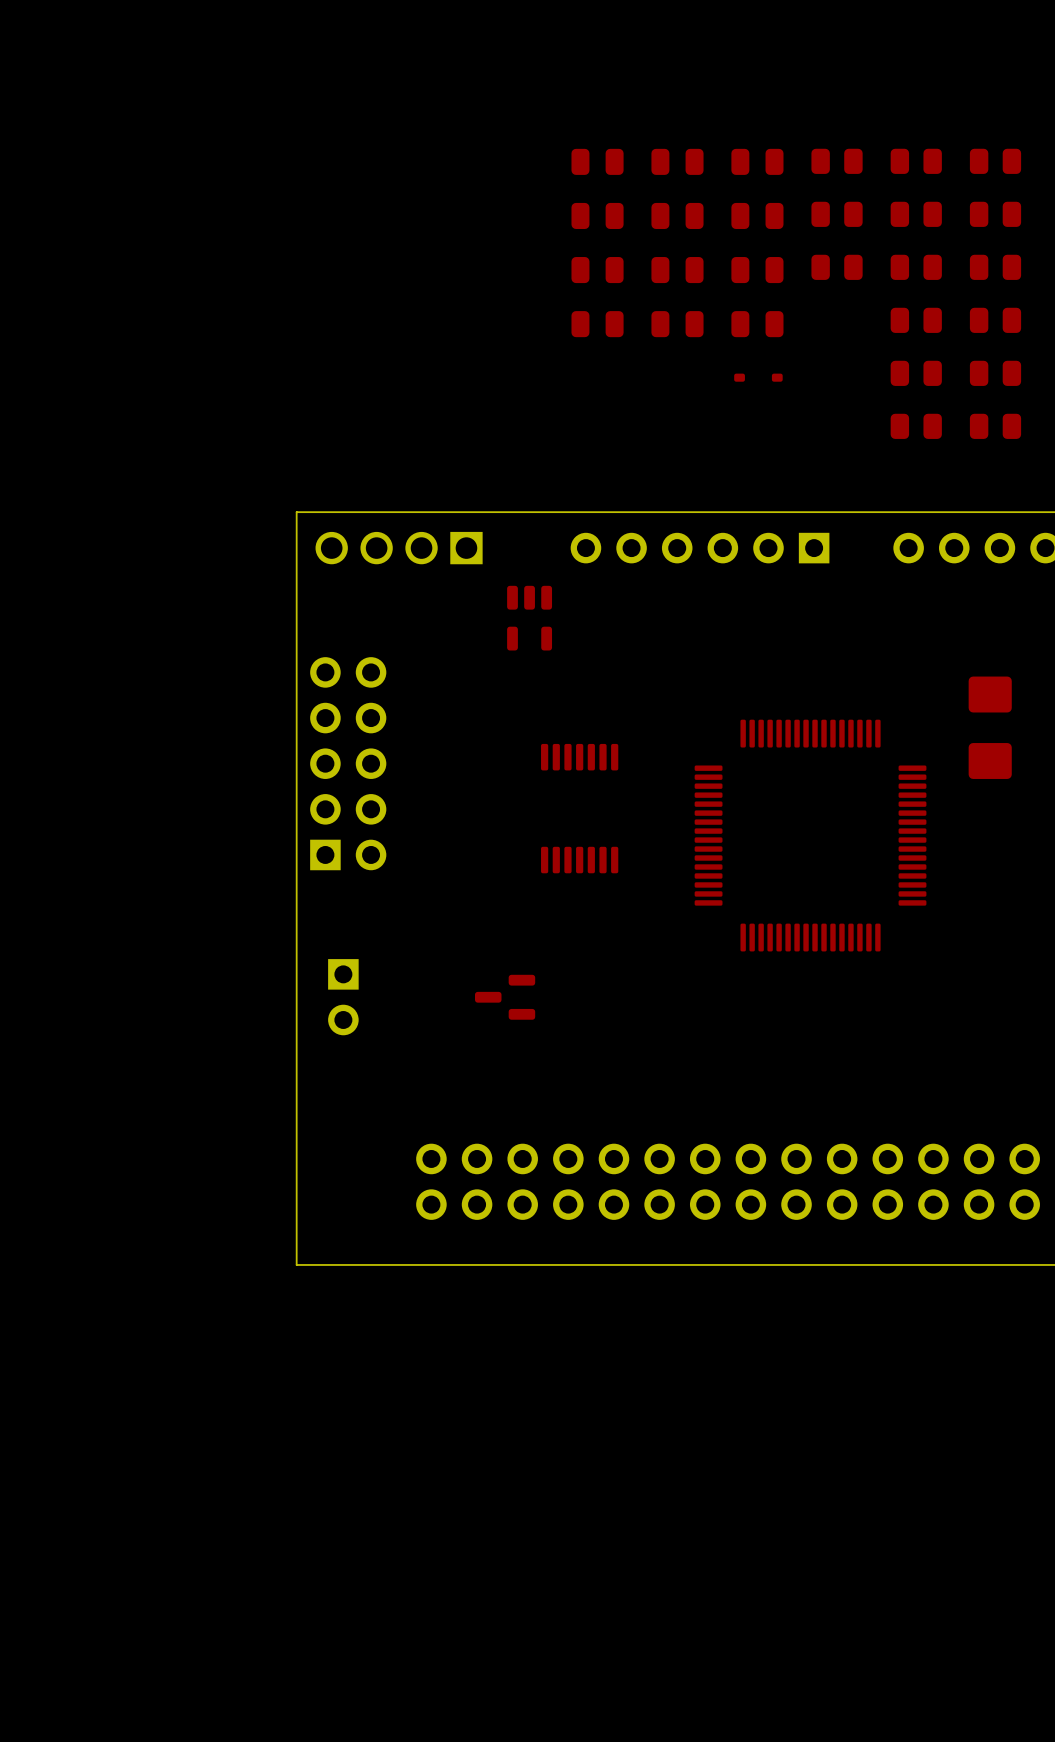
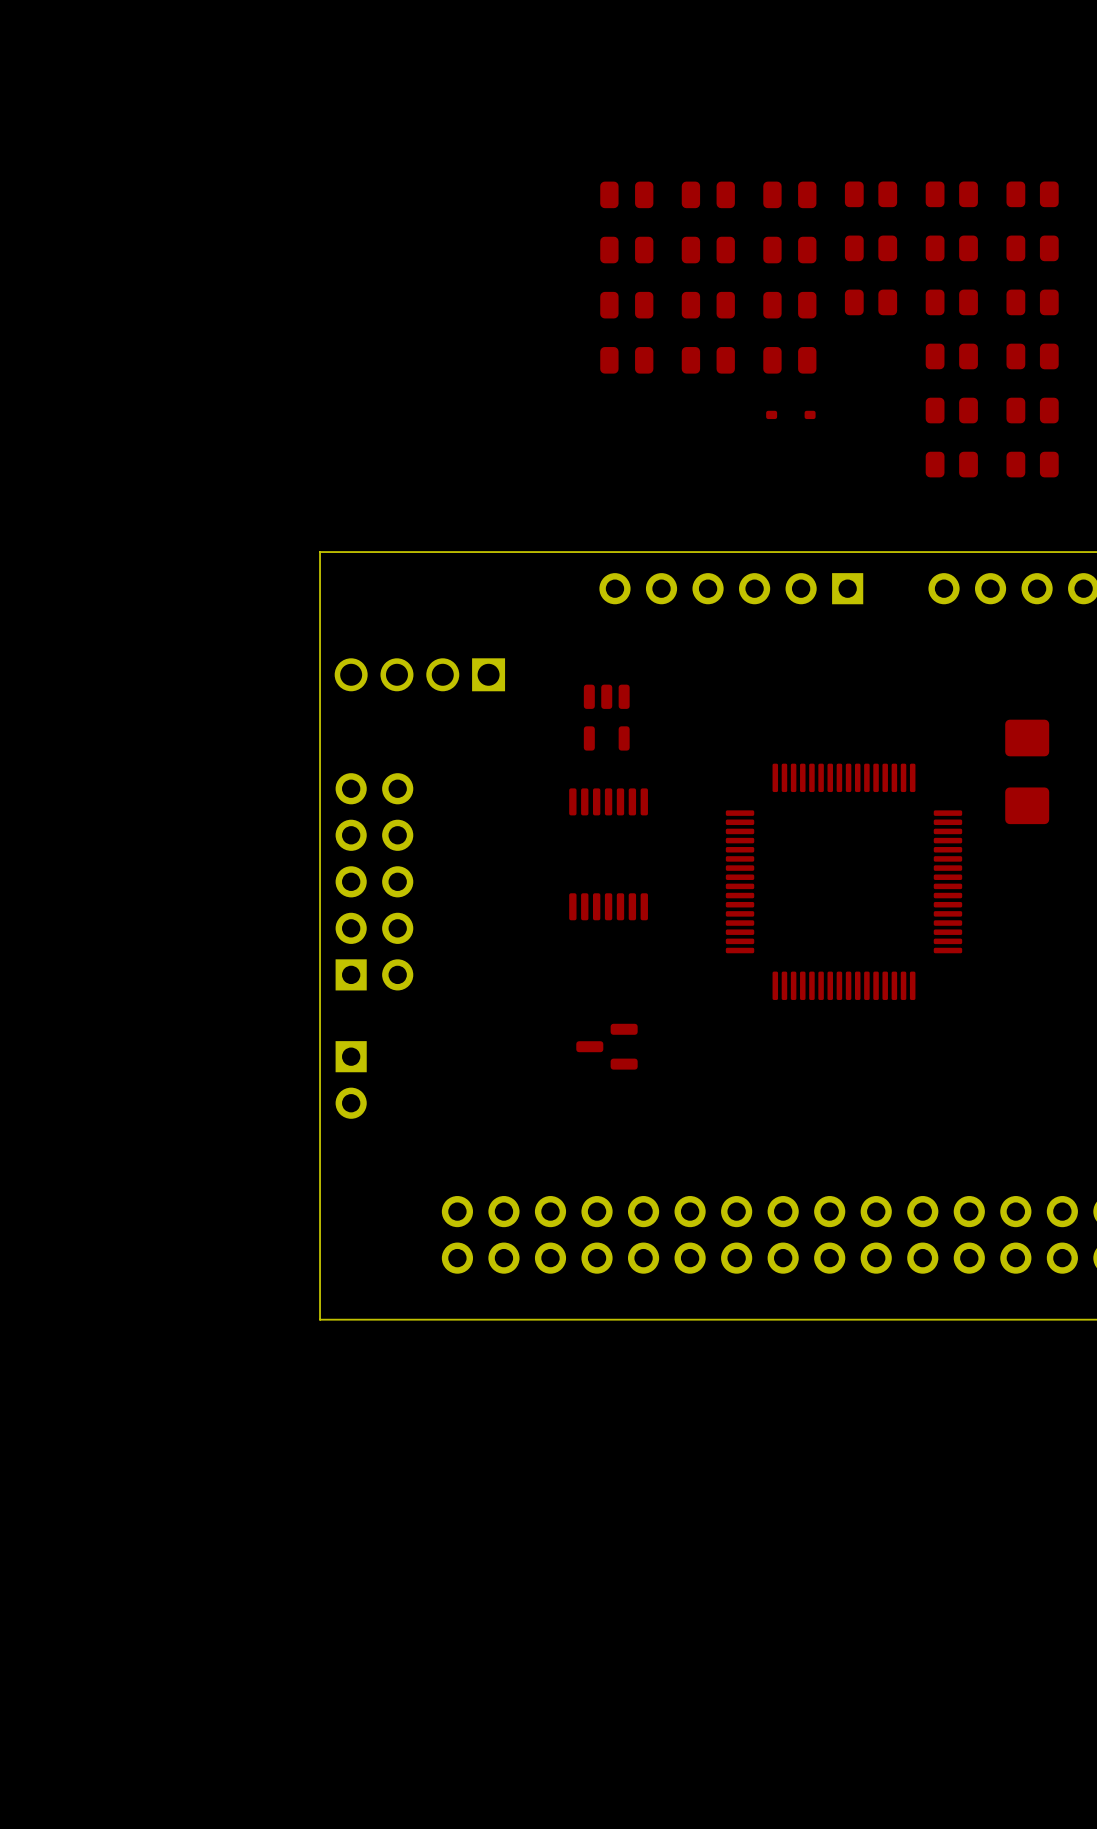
part position: (399, 548) -> (419, 674)
part position: (529, 618) -> (606, 717)
part position: (348, 763) -> (374, 881)
part position: (343, 997) -> (351, 1079)
part position: (505, 997) -> (606, 1046)

